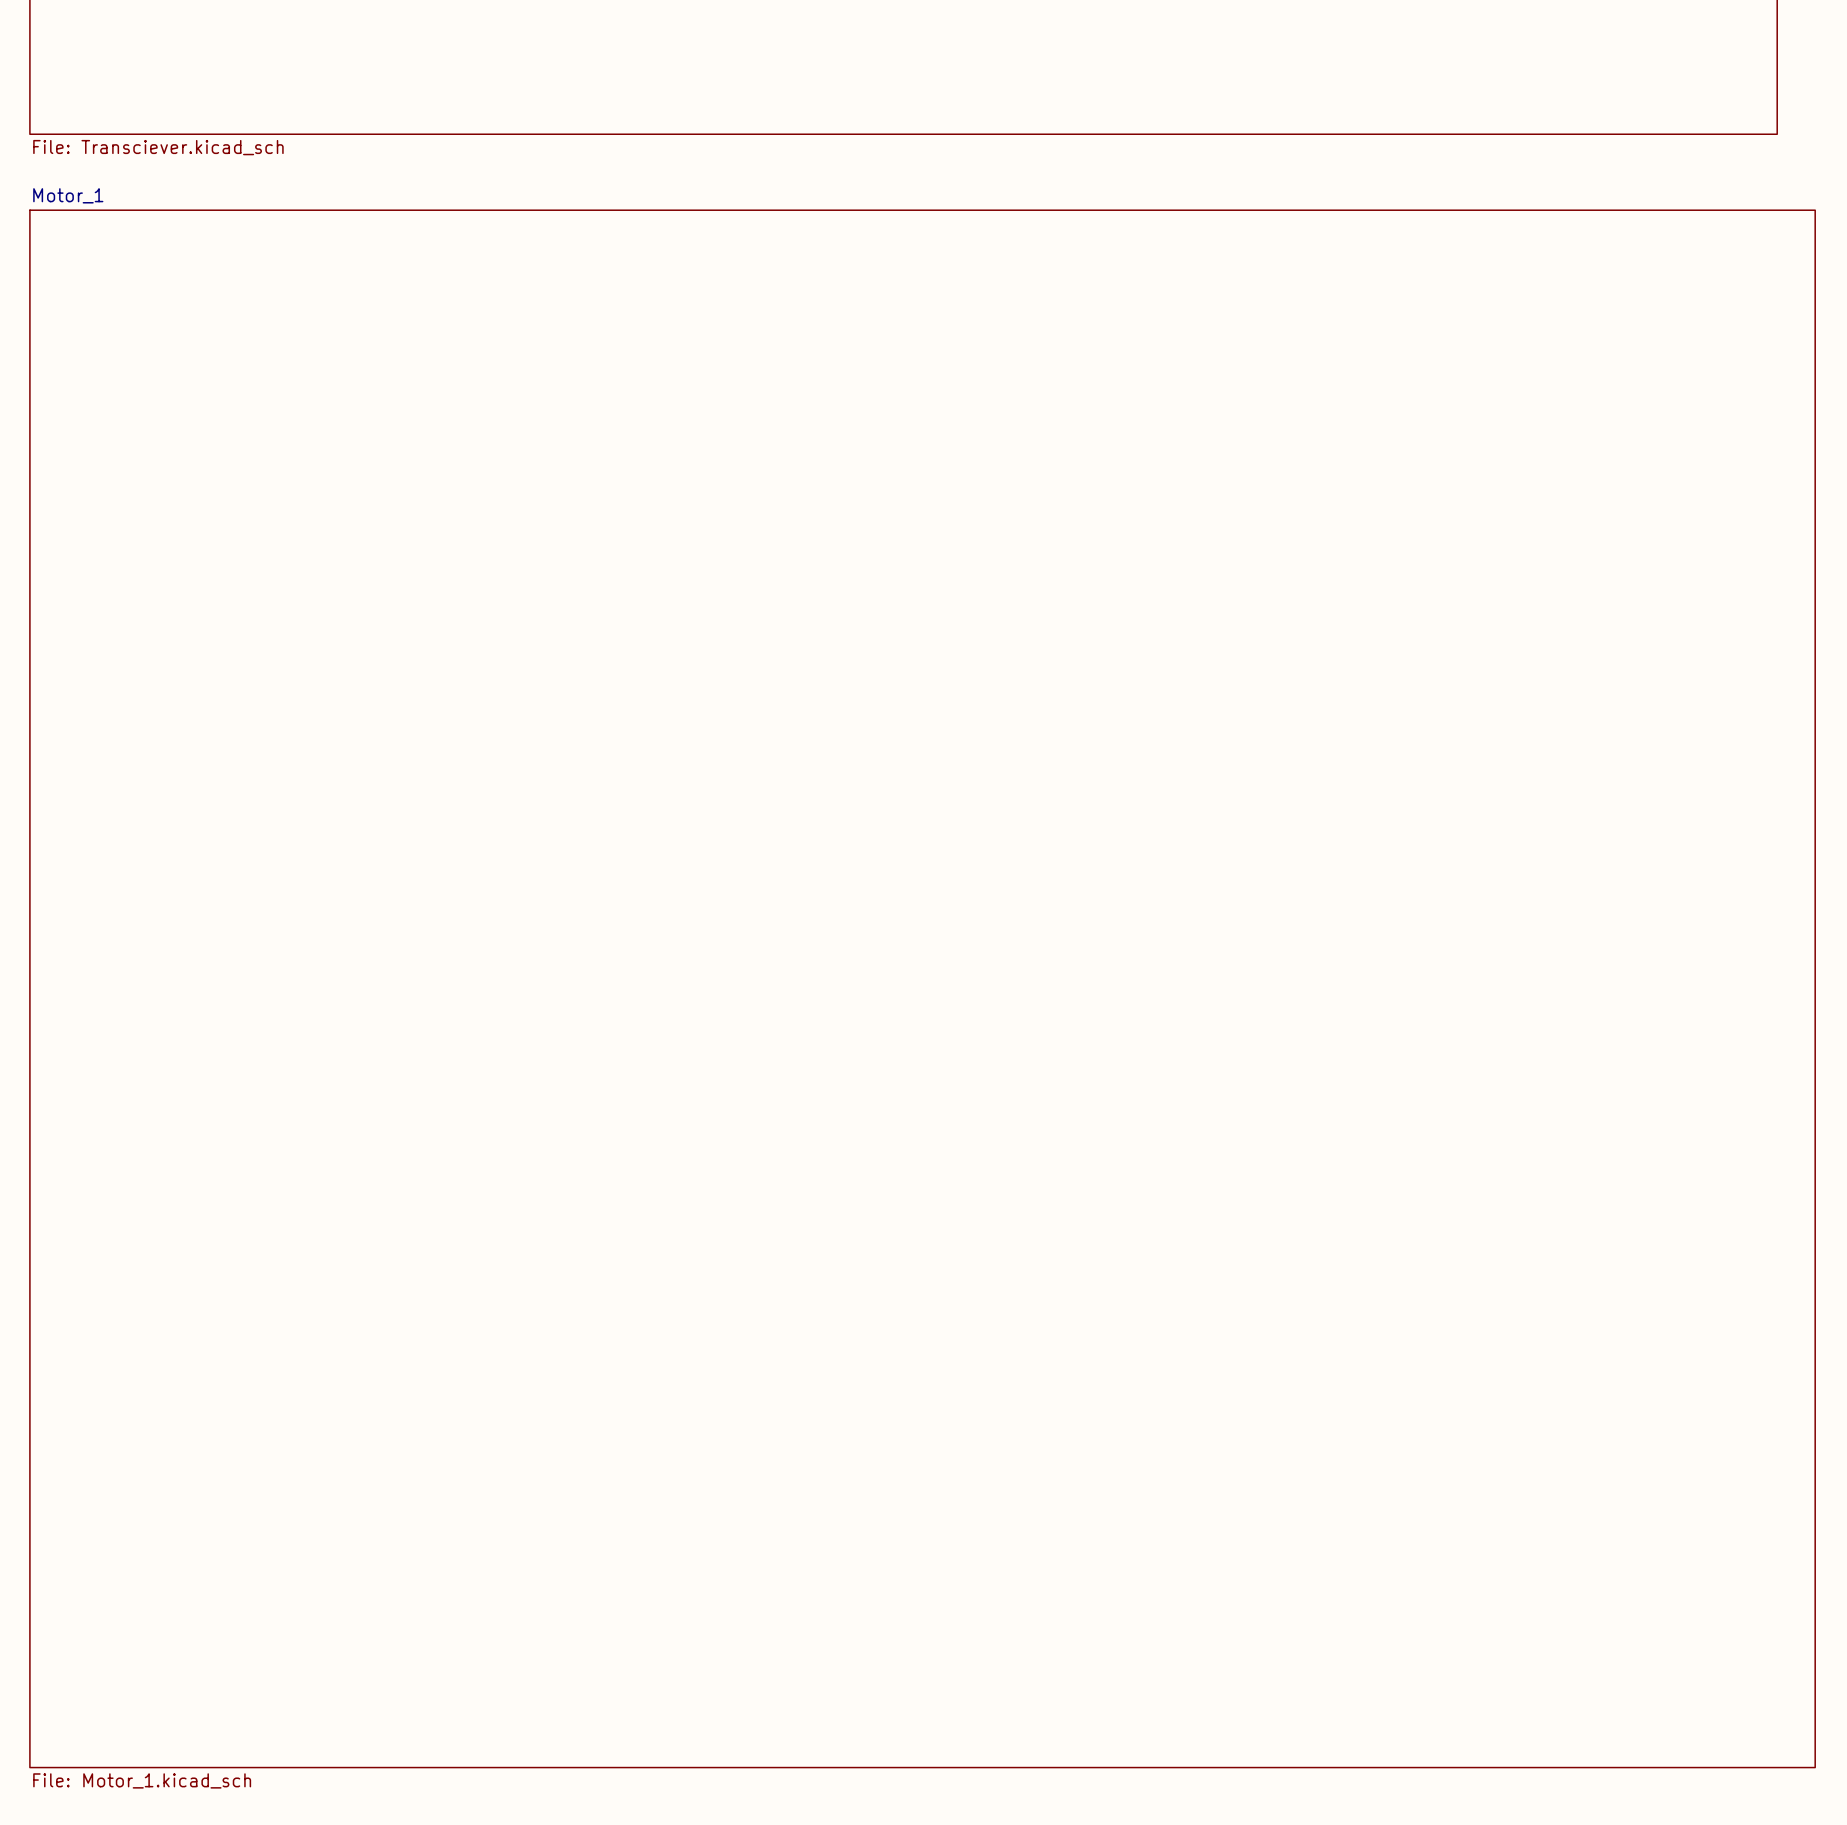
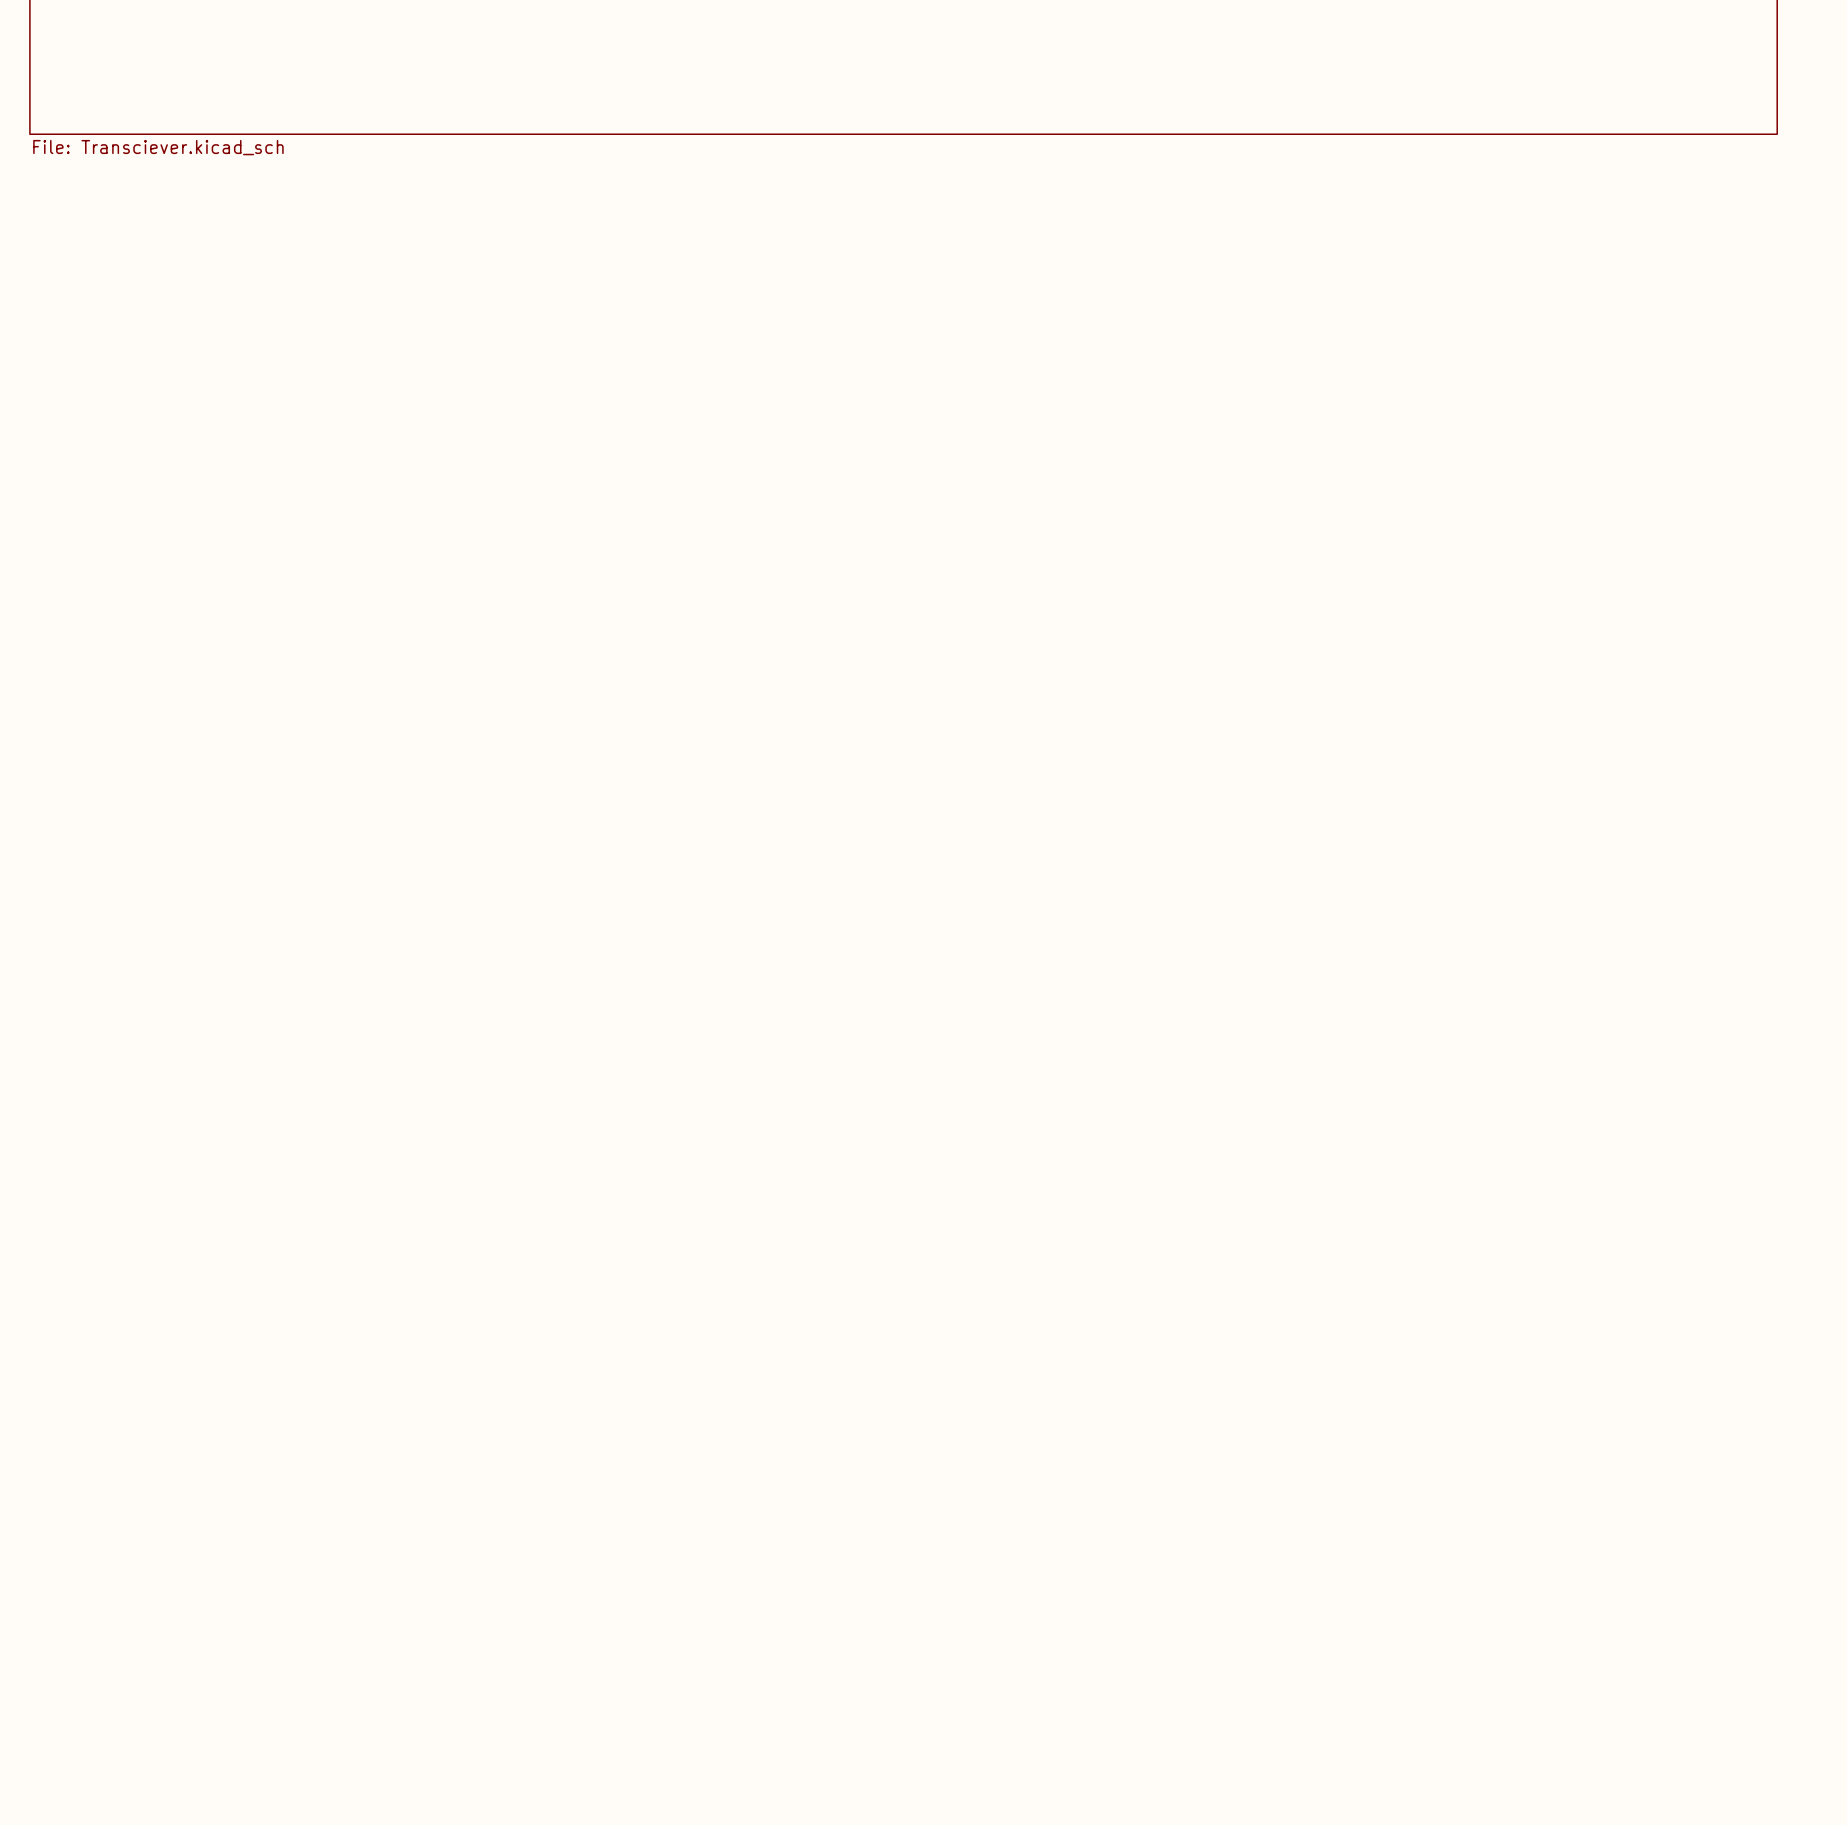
sheet Motor_1: File: Motor_1.kicad_sch (922, 988) -> none

